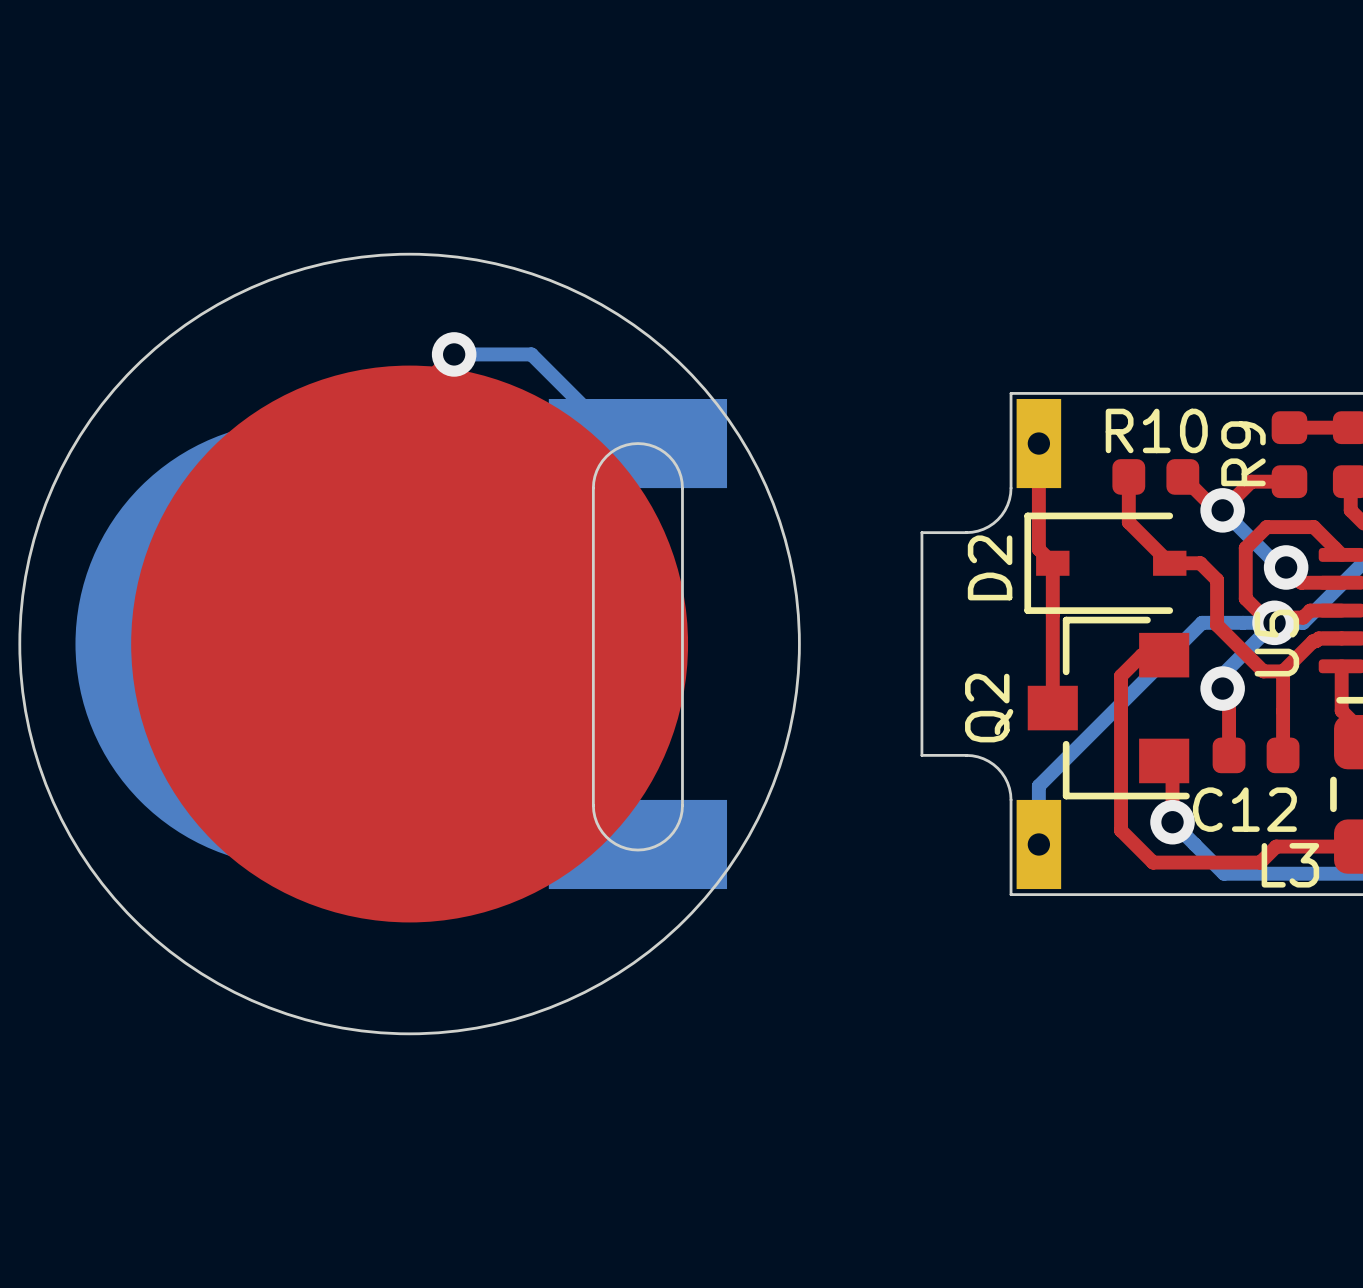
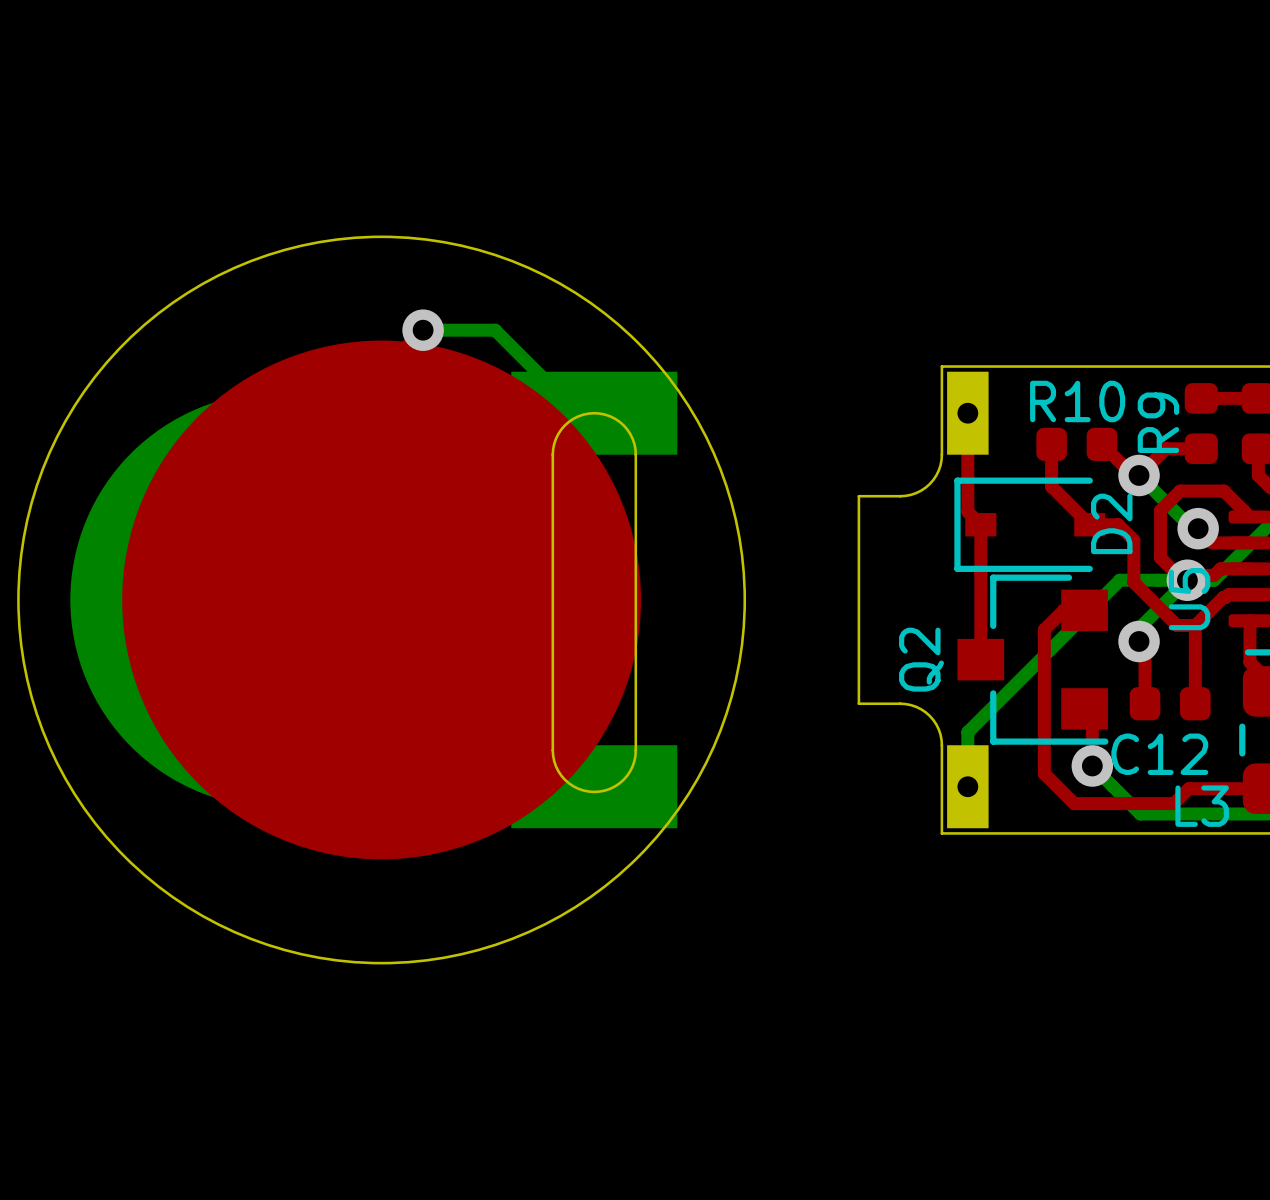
D2 name position: D2 (990, 567) -> D2 (1111, 523)

